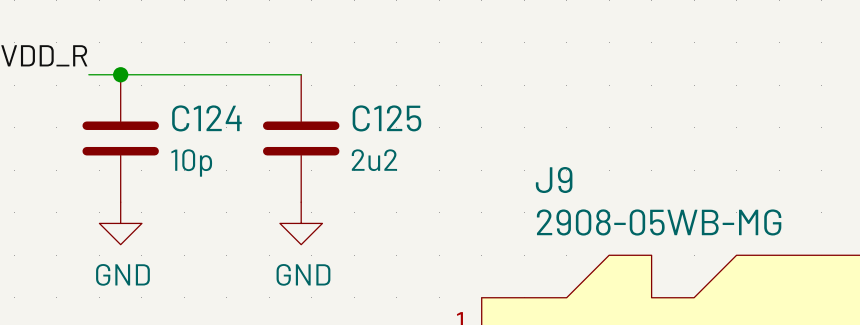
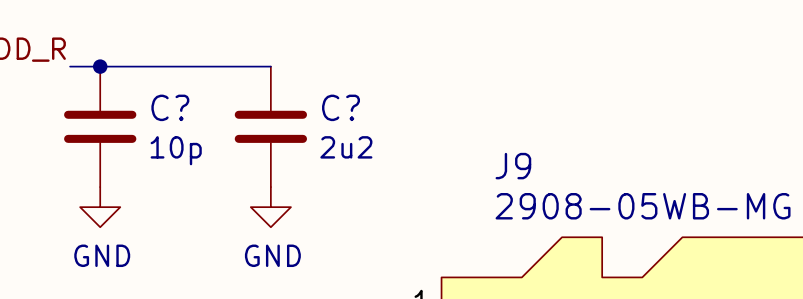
C124 name: C124 (206, 118) -> C? (170, 107)
C125 name: C125 (386, 118) -> C? (341, 107)

